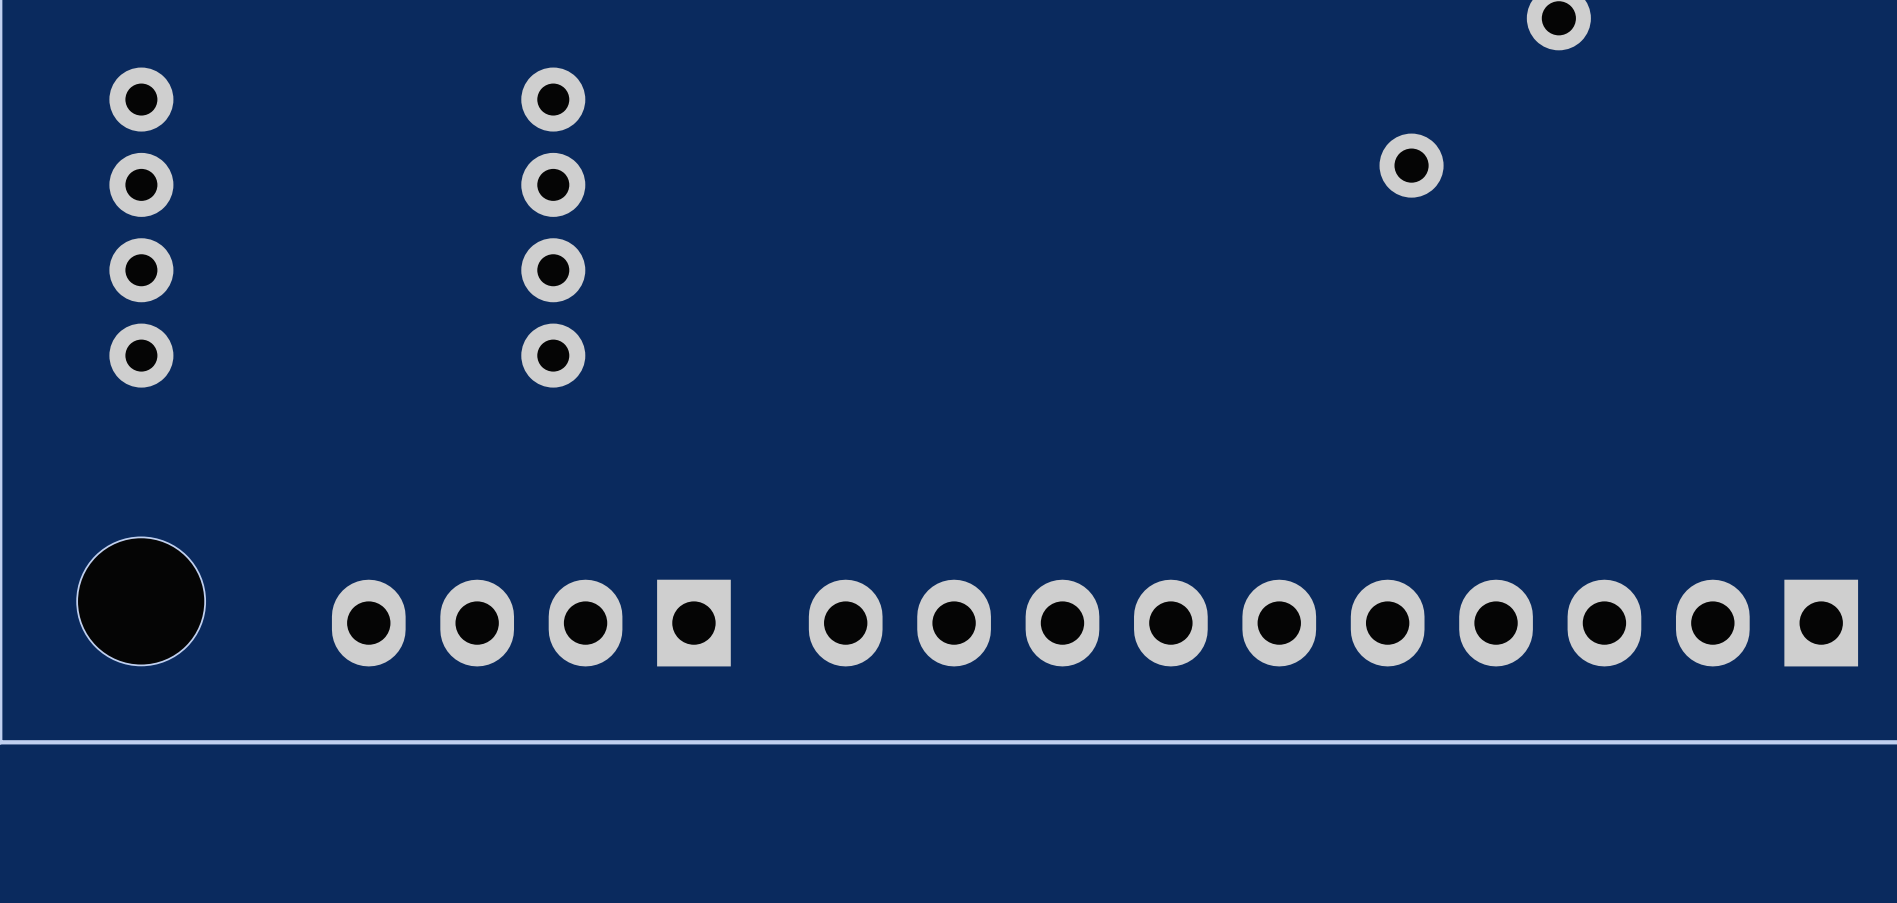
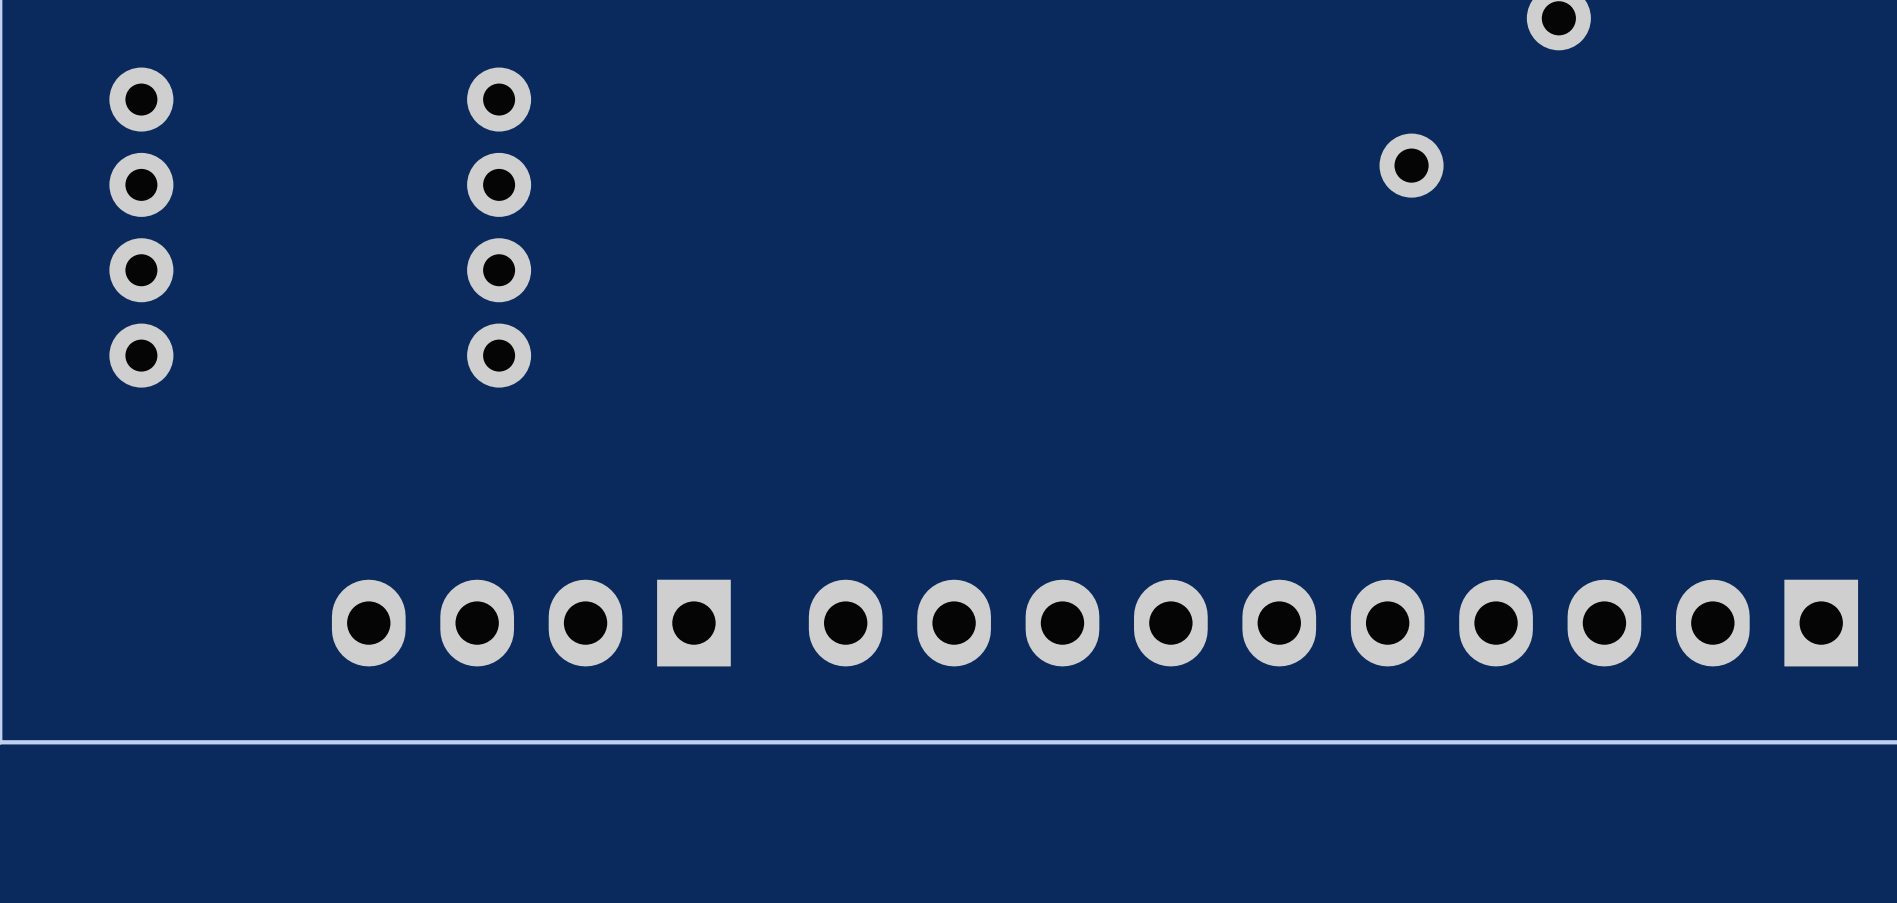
part position: (553, 227) -> (499, 227)
part: (141, 601) -> none

